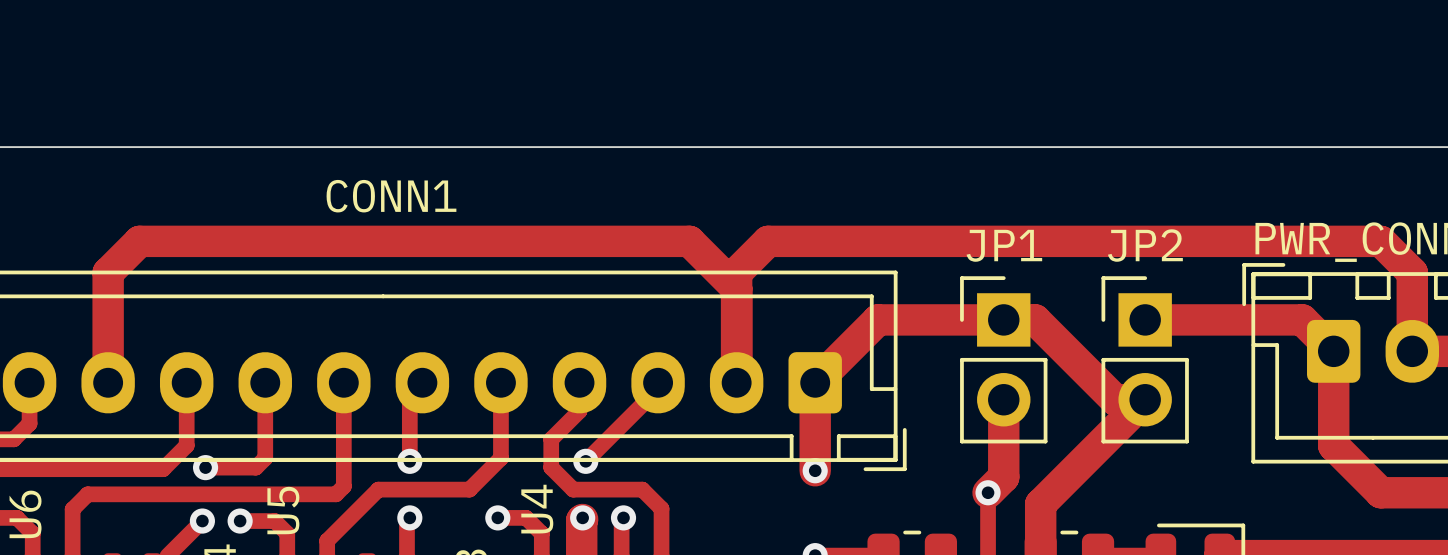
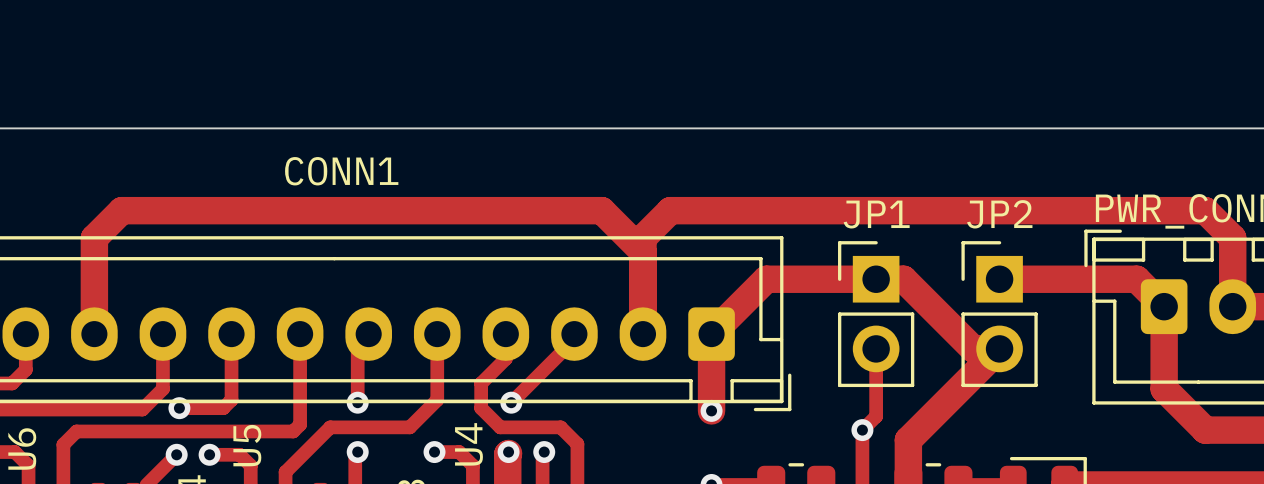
track width: thick (1003, 399) (1003, 477) (988, 492) -> thin (876, 348) (876, 416) (862, 430)

